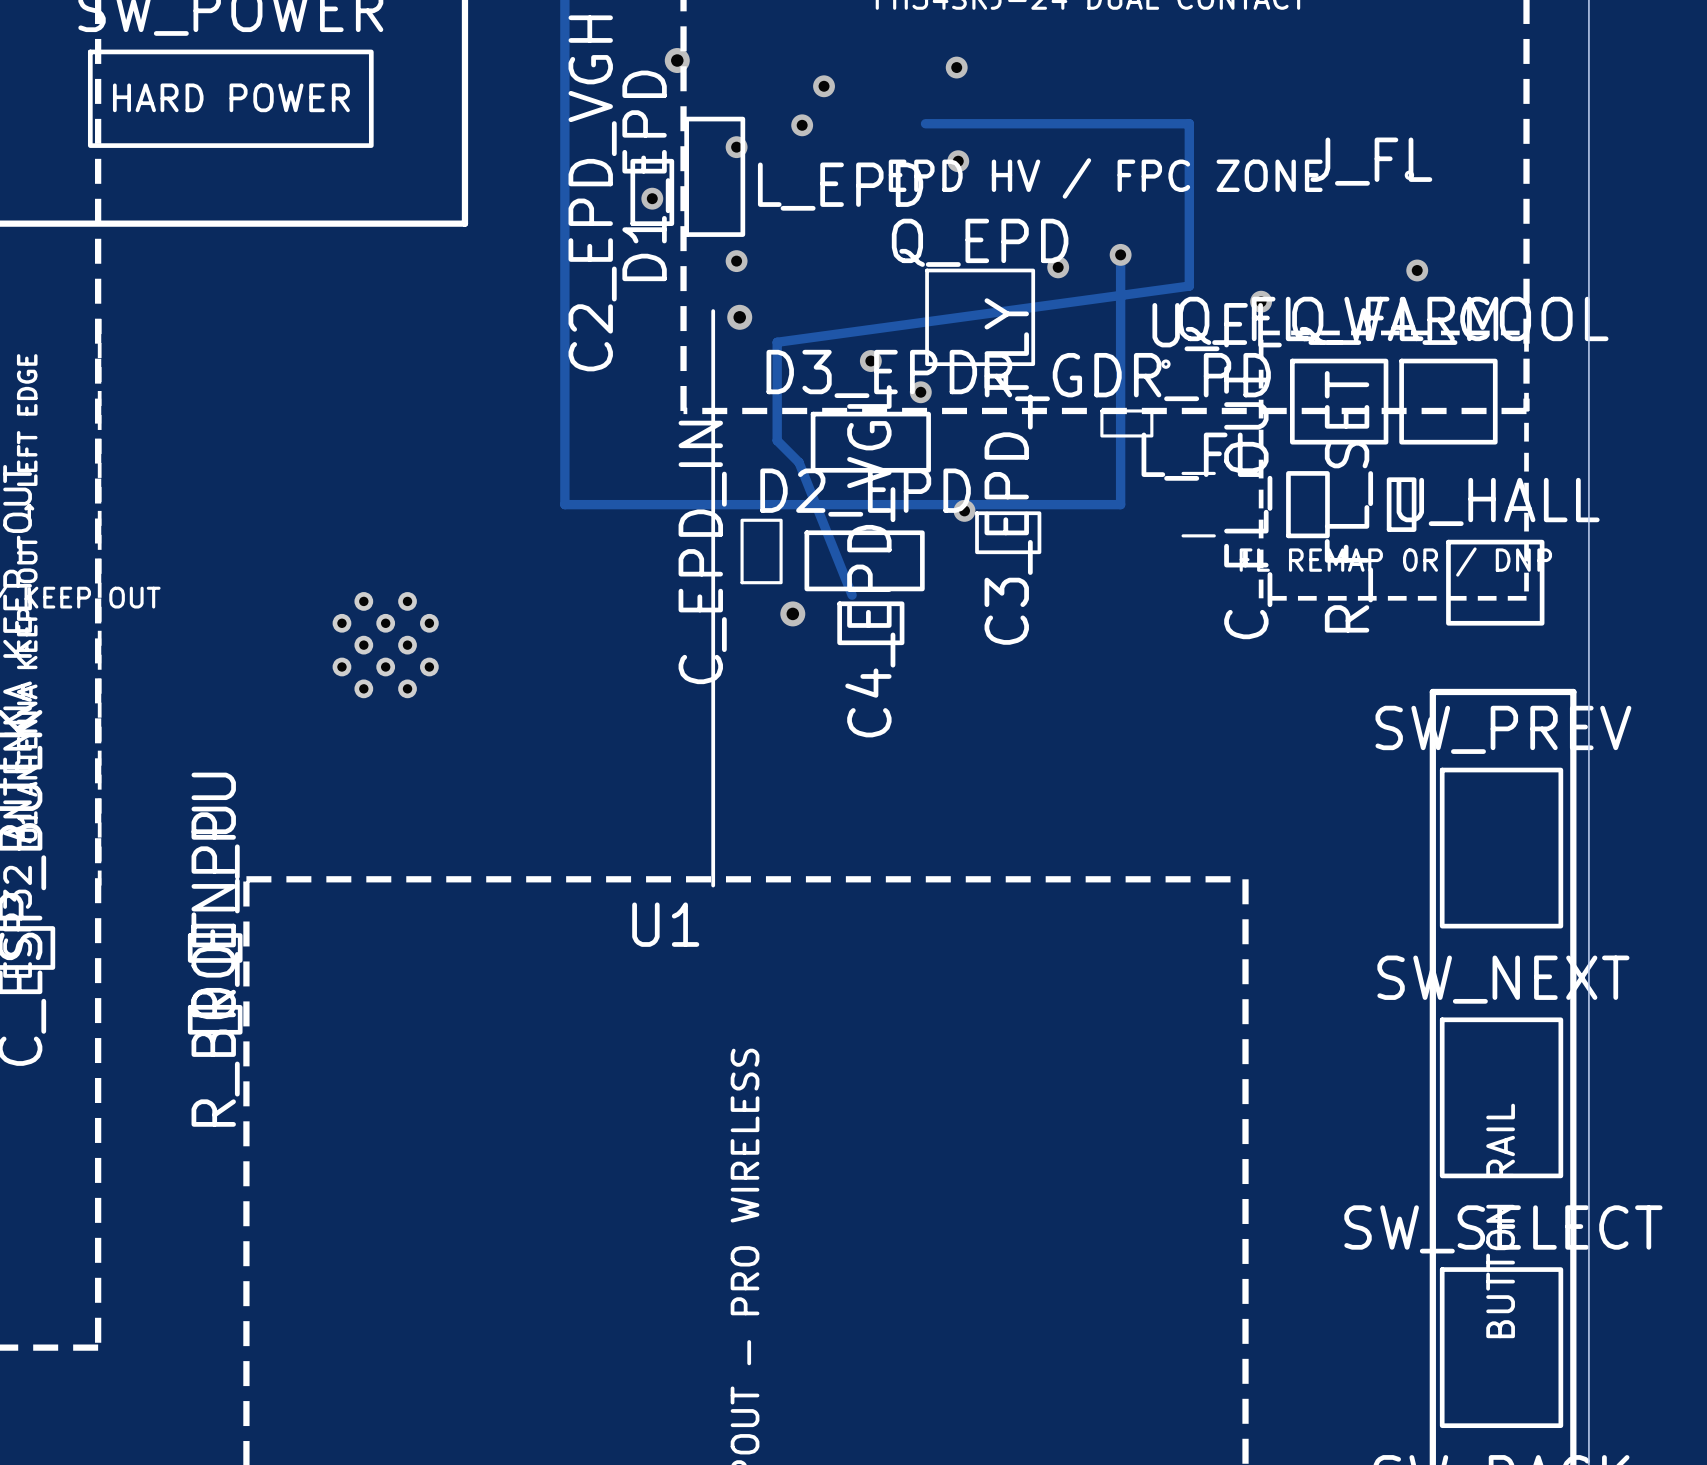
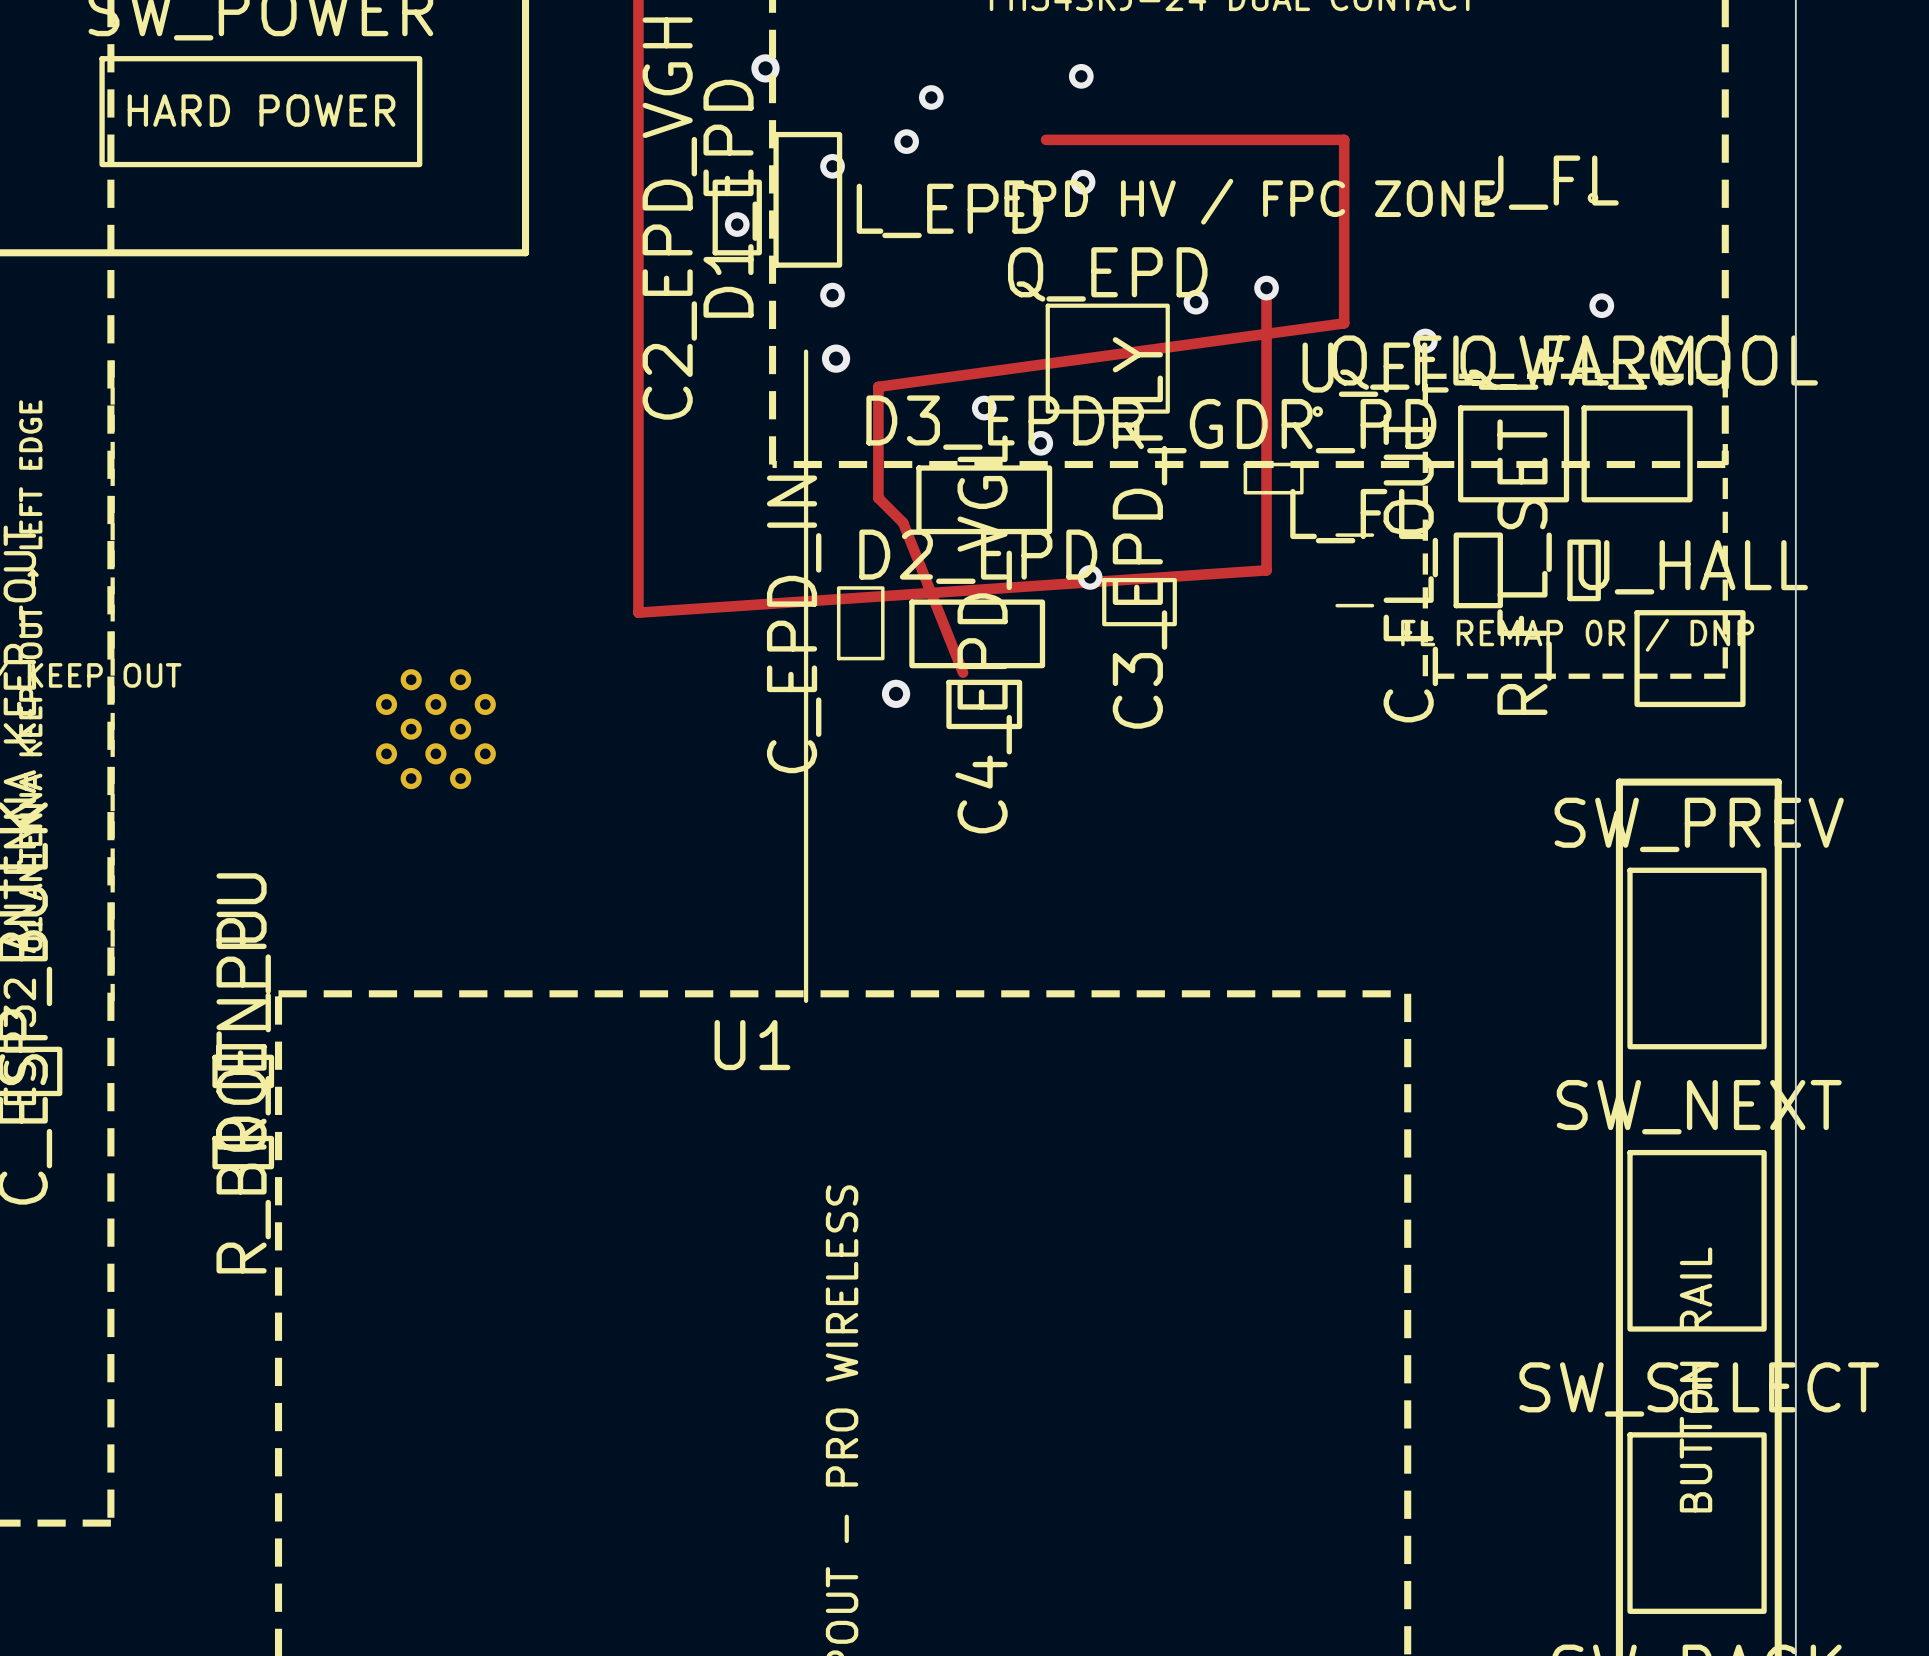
track: (564, 504) (1120, 504) -> (638, 570) (638, 612) (1266, 570)

